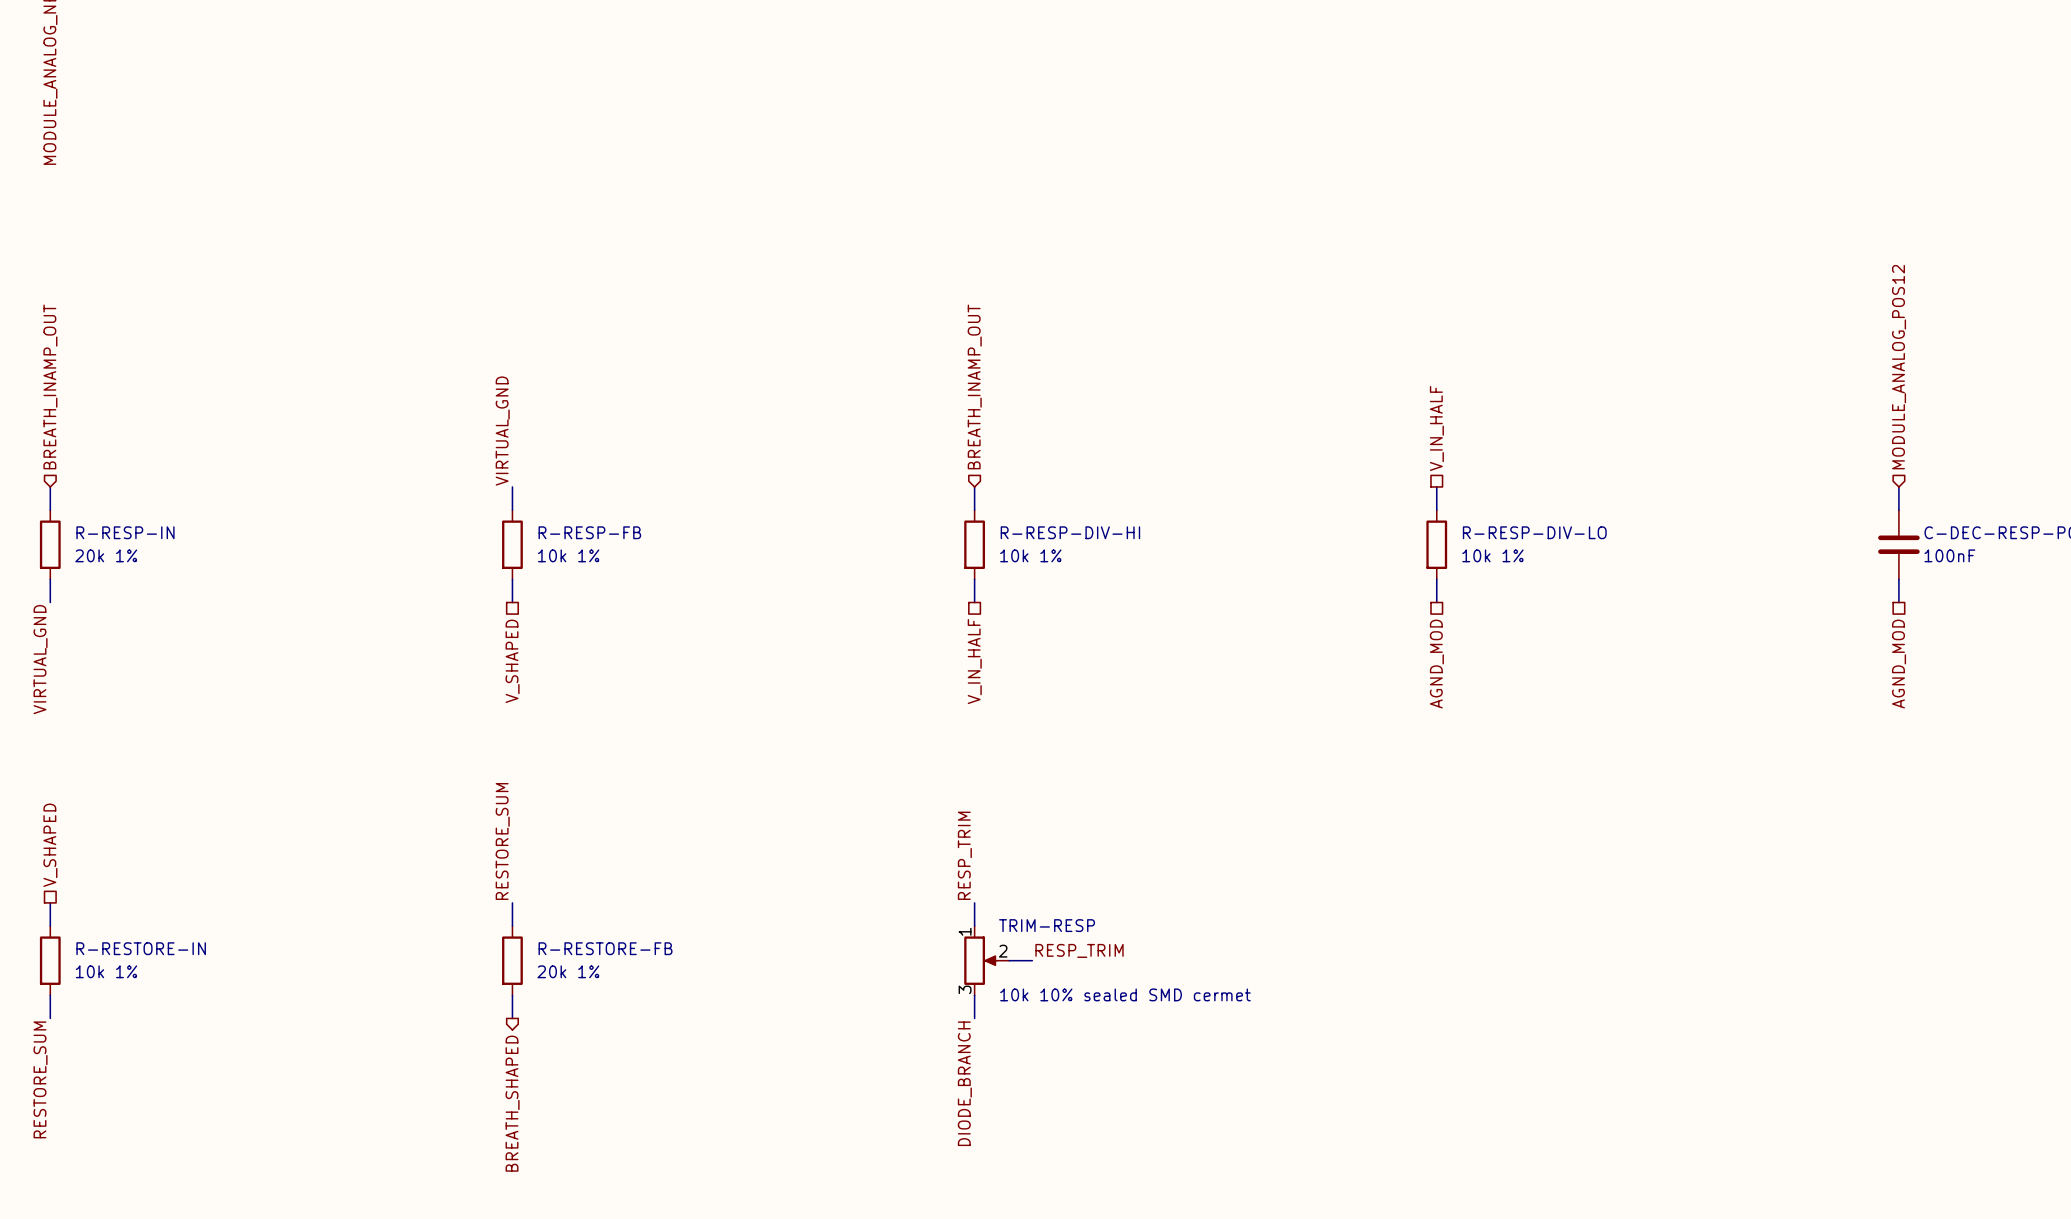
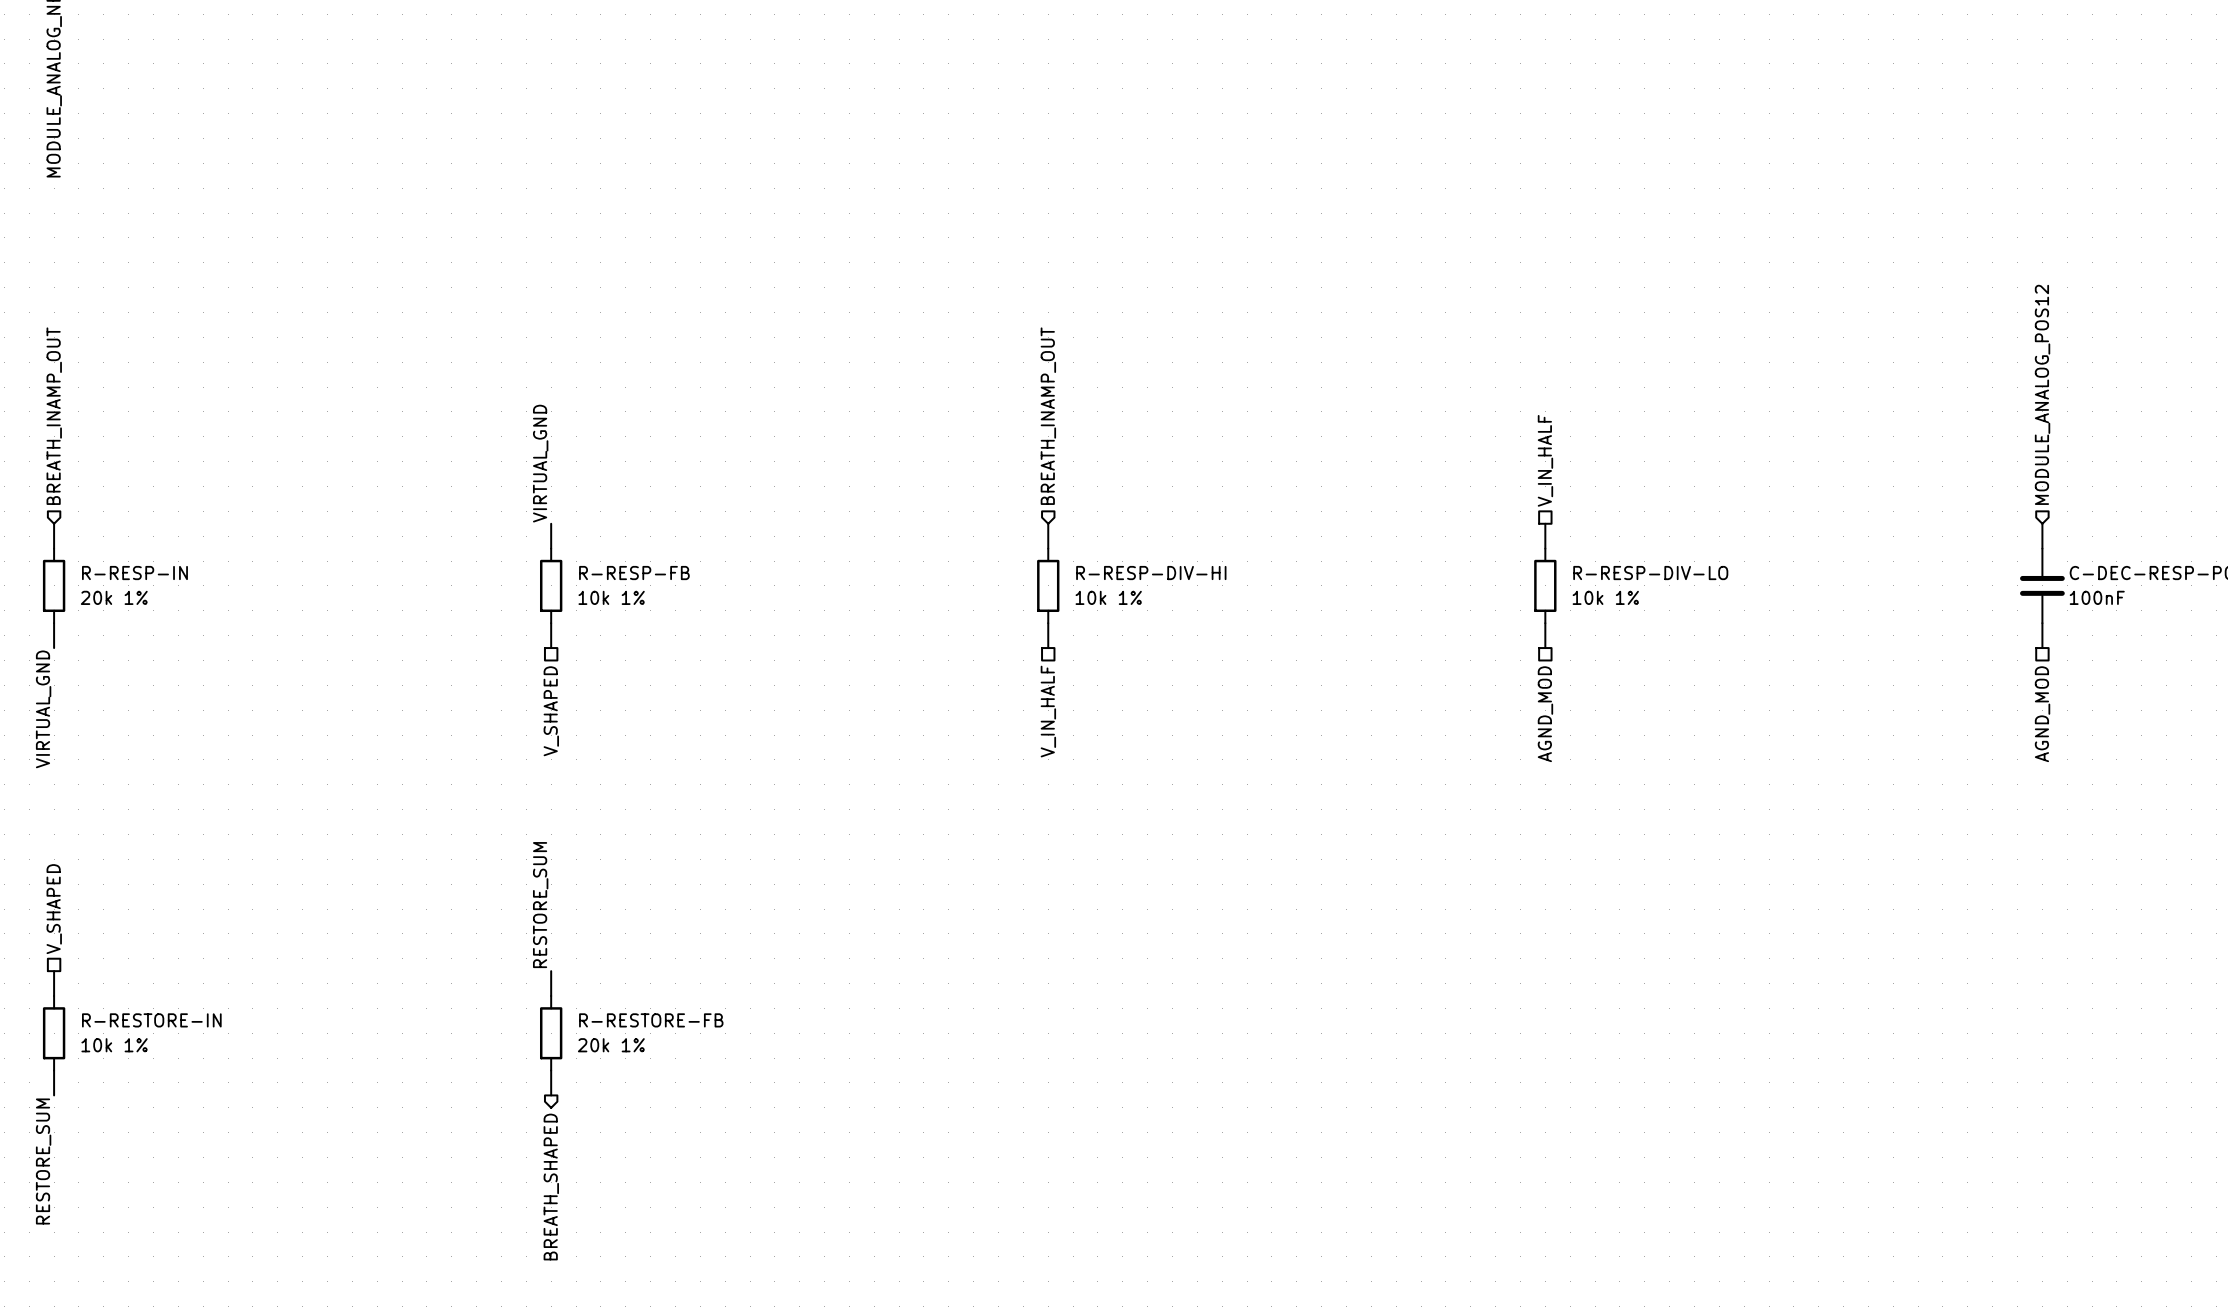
label: RESP_TRIM (964, 855) -> none
wire: (974, 902) (974, 926) -> none
label: RESP_TRIM (1079, 950) -> none
TRIM-RESP: 10k 10% sealed SMD cermet (986, 960) -> none
wire: (1009, 960) (1032, 960) -> none
wire: (974, 995) (974, 1018) -> none
label: DIODE_BRANCH (964, 1083) -> none

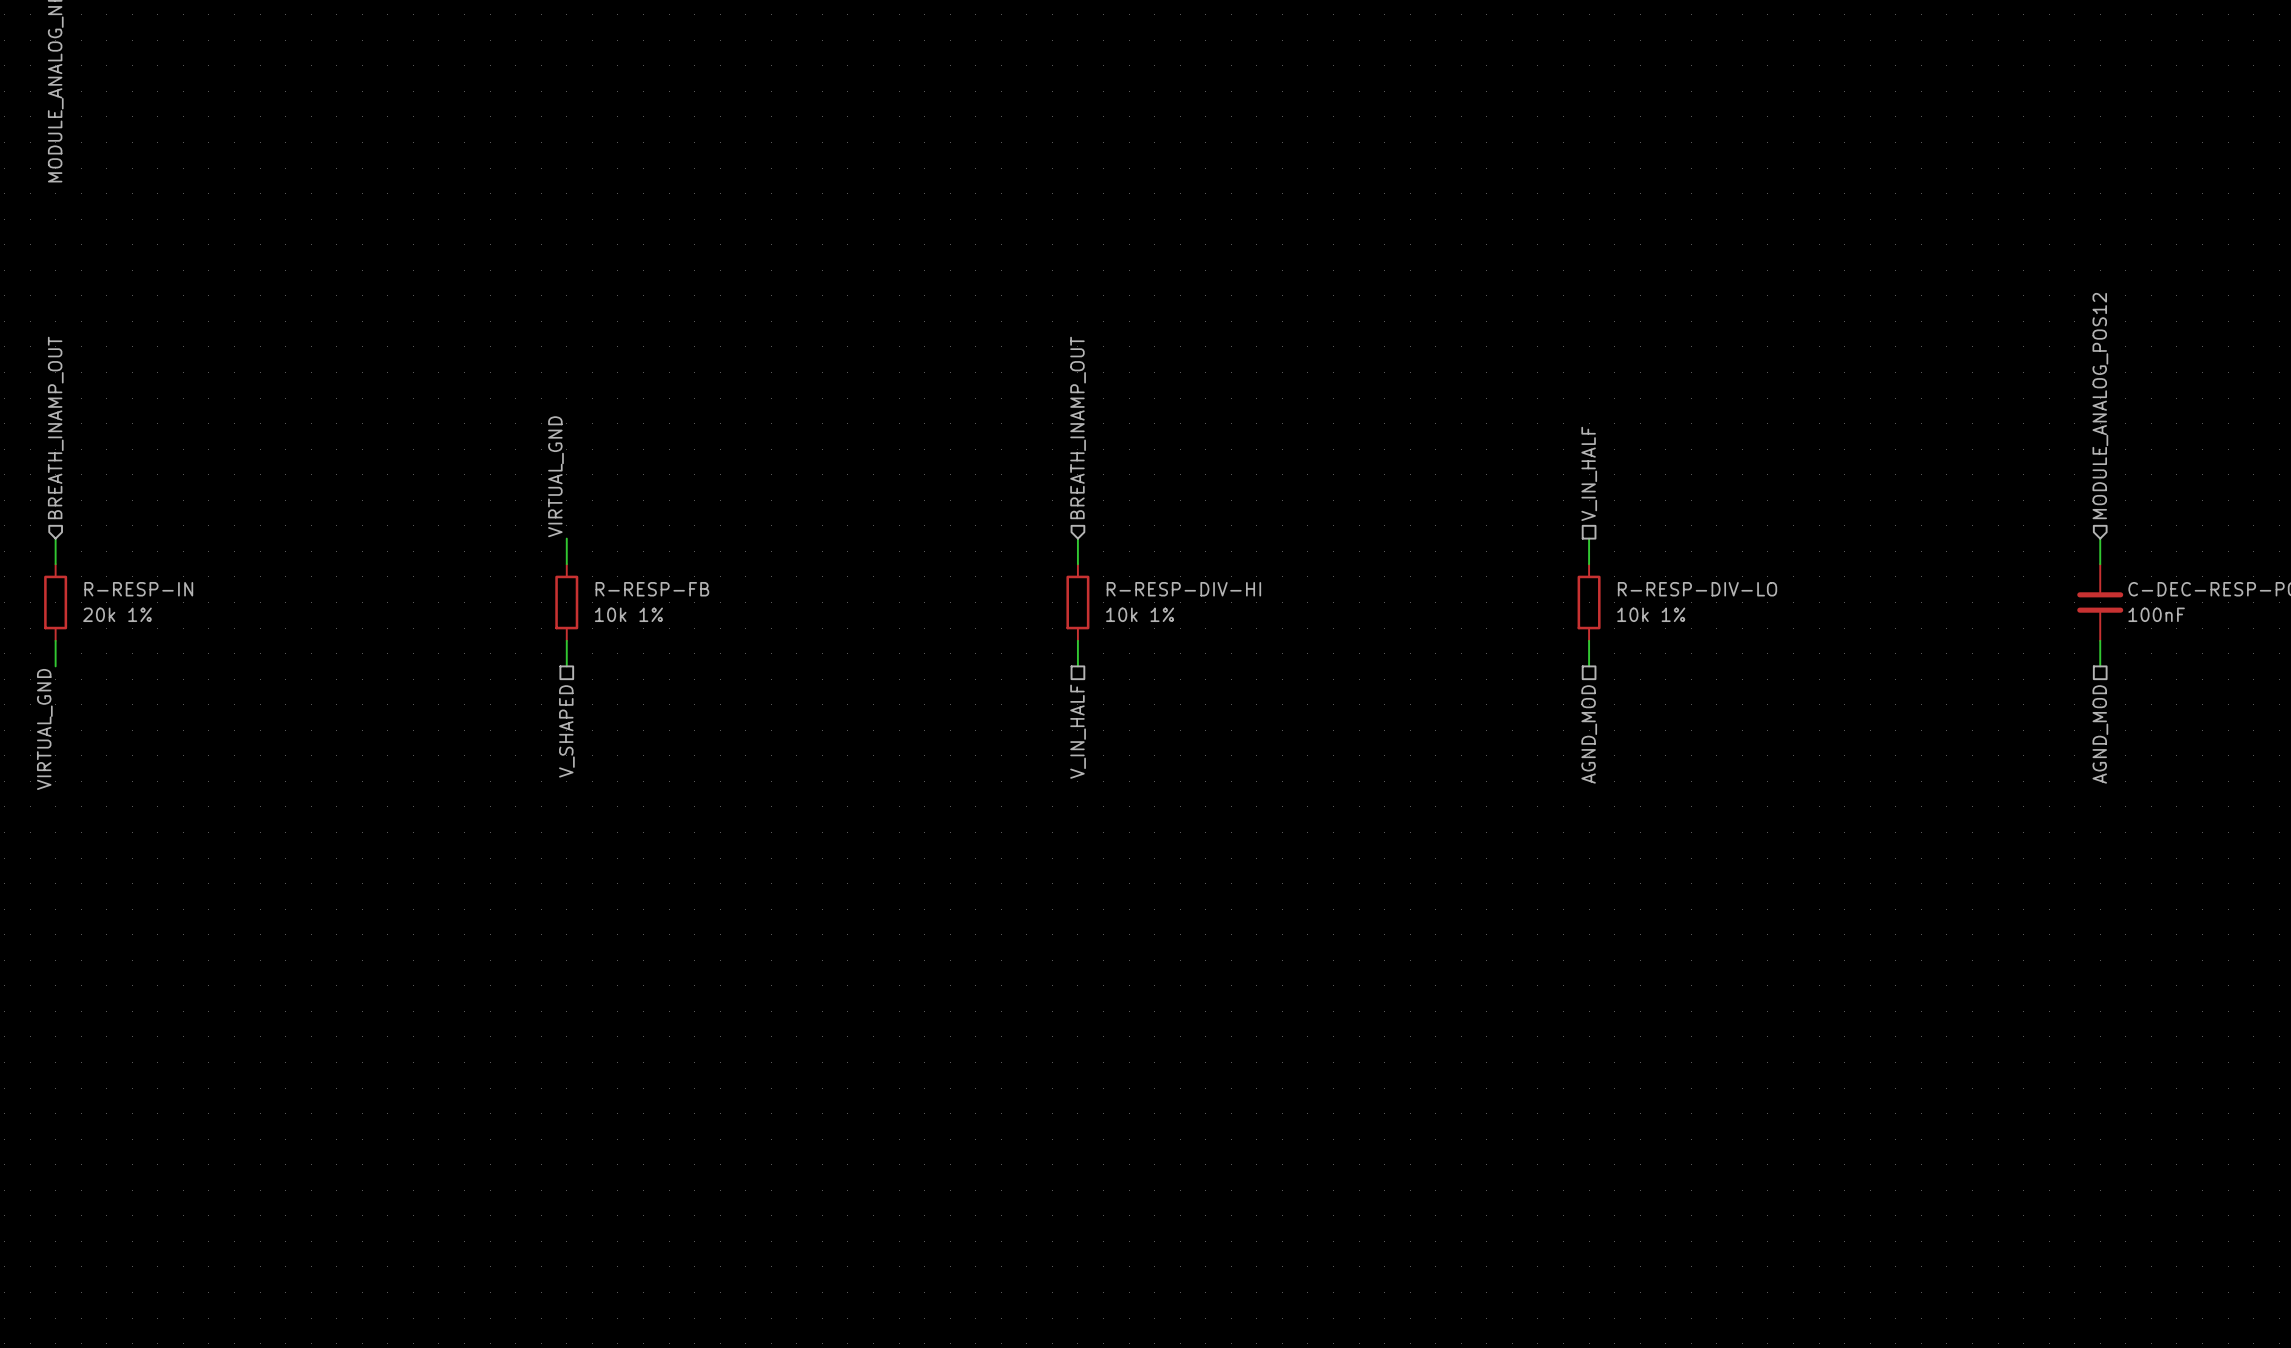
label: RESTORE_SUM (540, 905) -> none
hierarchical label: V_SHAPED (54, 909) -> none
wire: (54, 971) (54, 996) -> none
wire: (551, 971) (551, 996) -> none
R-RESTORE-IN: 10k 1% (54, 1033) -> none
R-RESTORE-FB: 20k 1% (551, 1033) -> none
wire: (54, 1070) (54, 1095) -> none
wire: (551, 1070) (551, 1095) -> none
label: RESTORE_SUM (43, 1161) -> none
hierarchical label: BREATH_SHAPED (551, 1187) -> none

